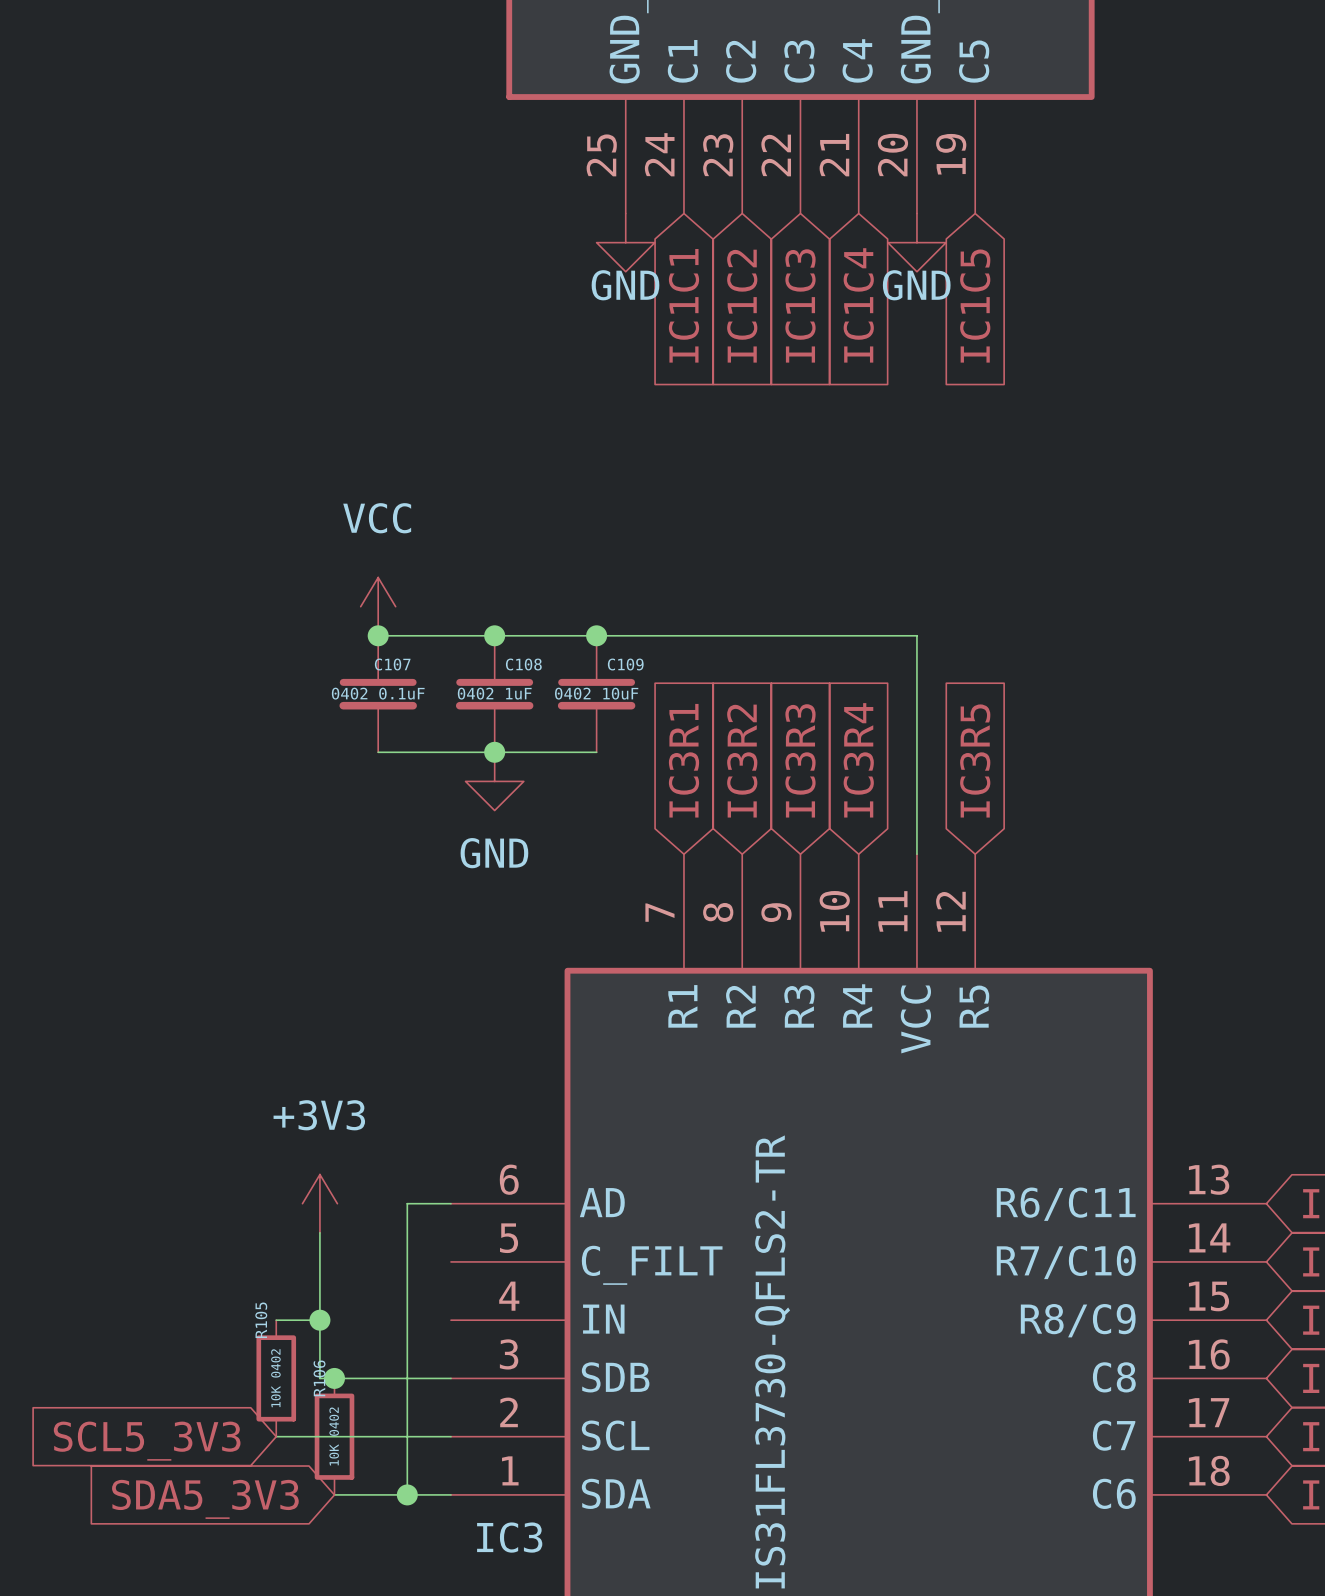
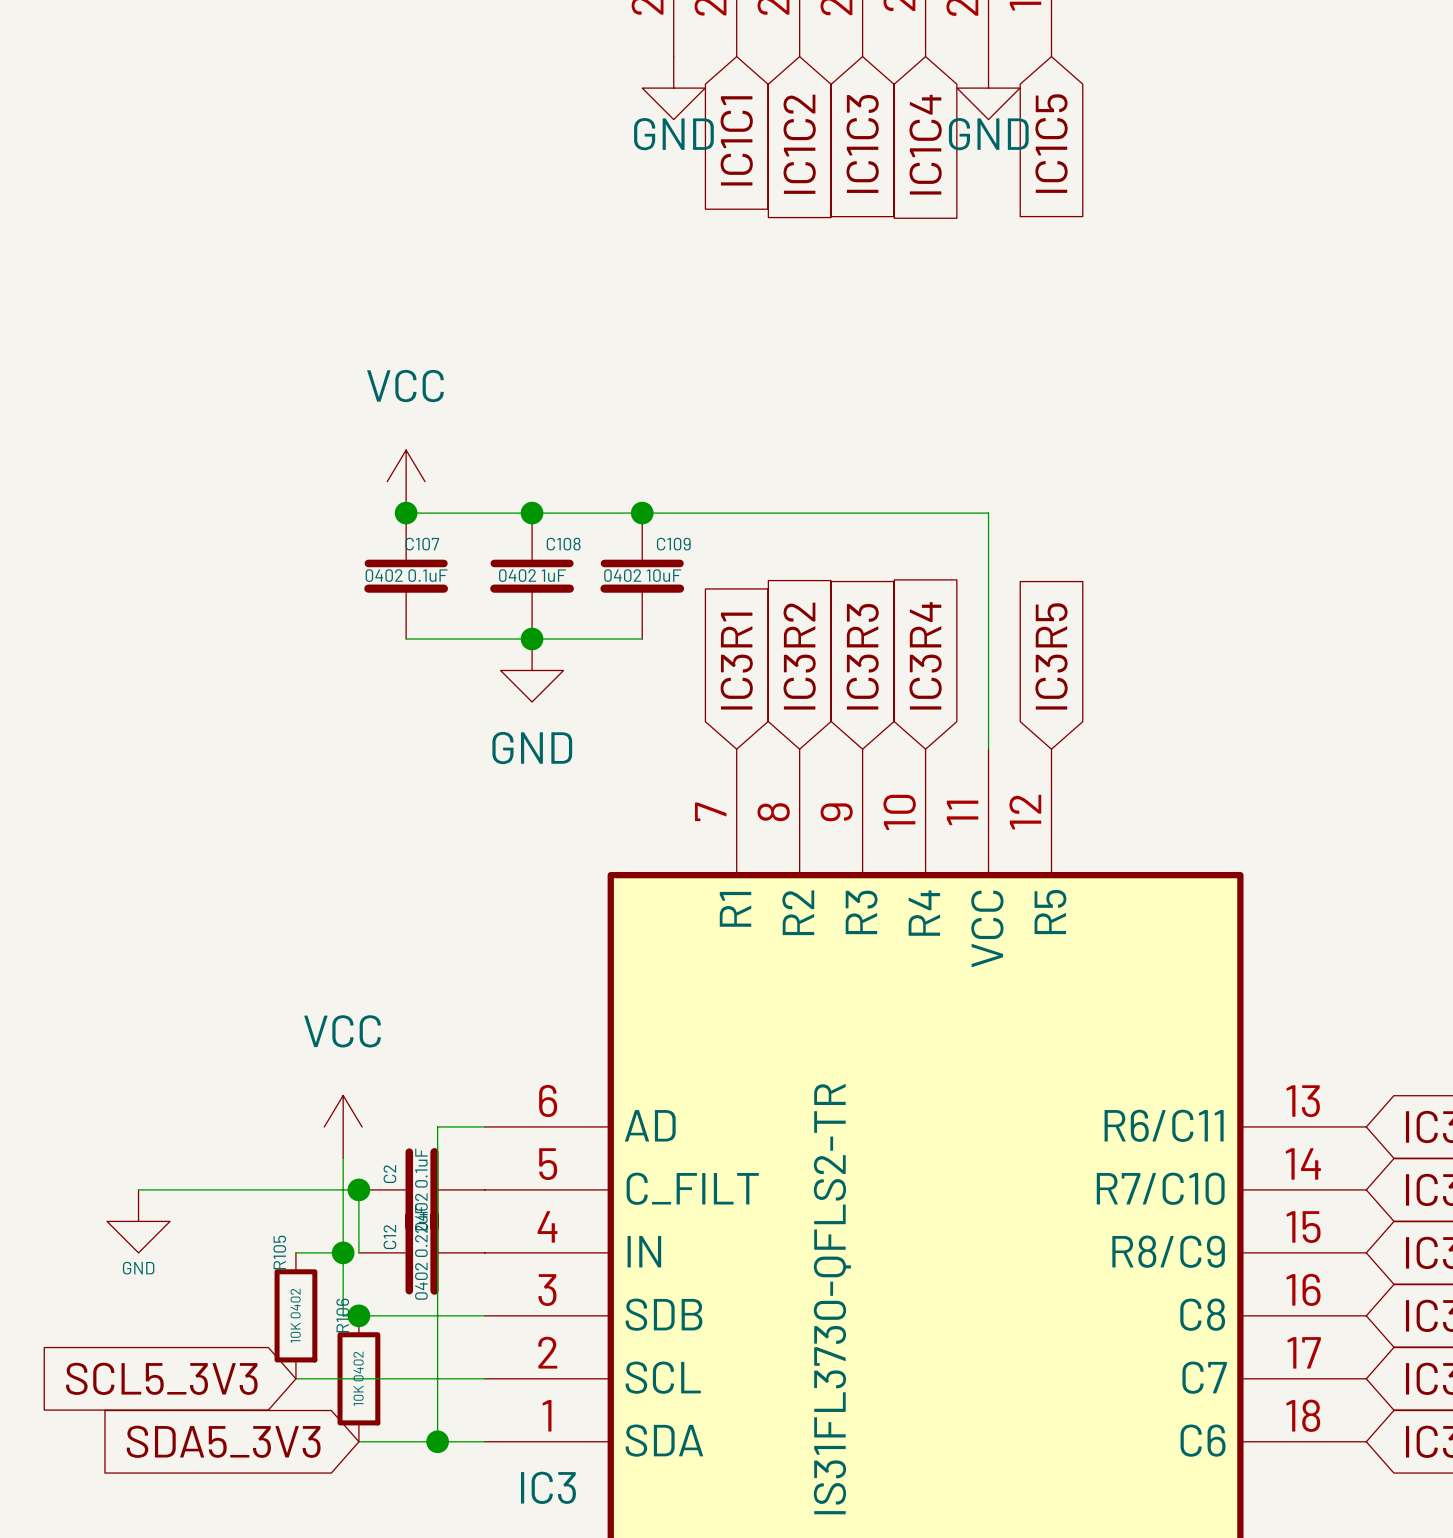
power symbol: +3V3 (319, 1203) -> VCC (343, 1126)
wire: none -> (138, 1189) (358, 1189) (358, 1252)
junction: none -> (358, 1189)
C2: none -> 0402 0.1uF (421, 1189)
power symbol: none -> GND (138, 1221)
C12: none -> 0402 0.22uF (421, 1252)

